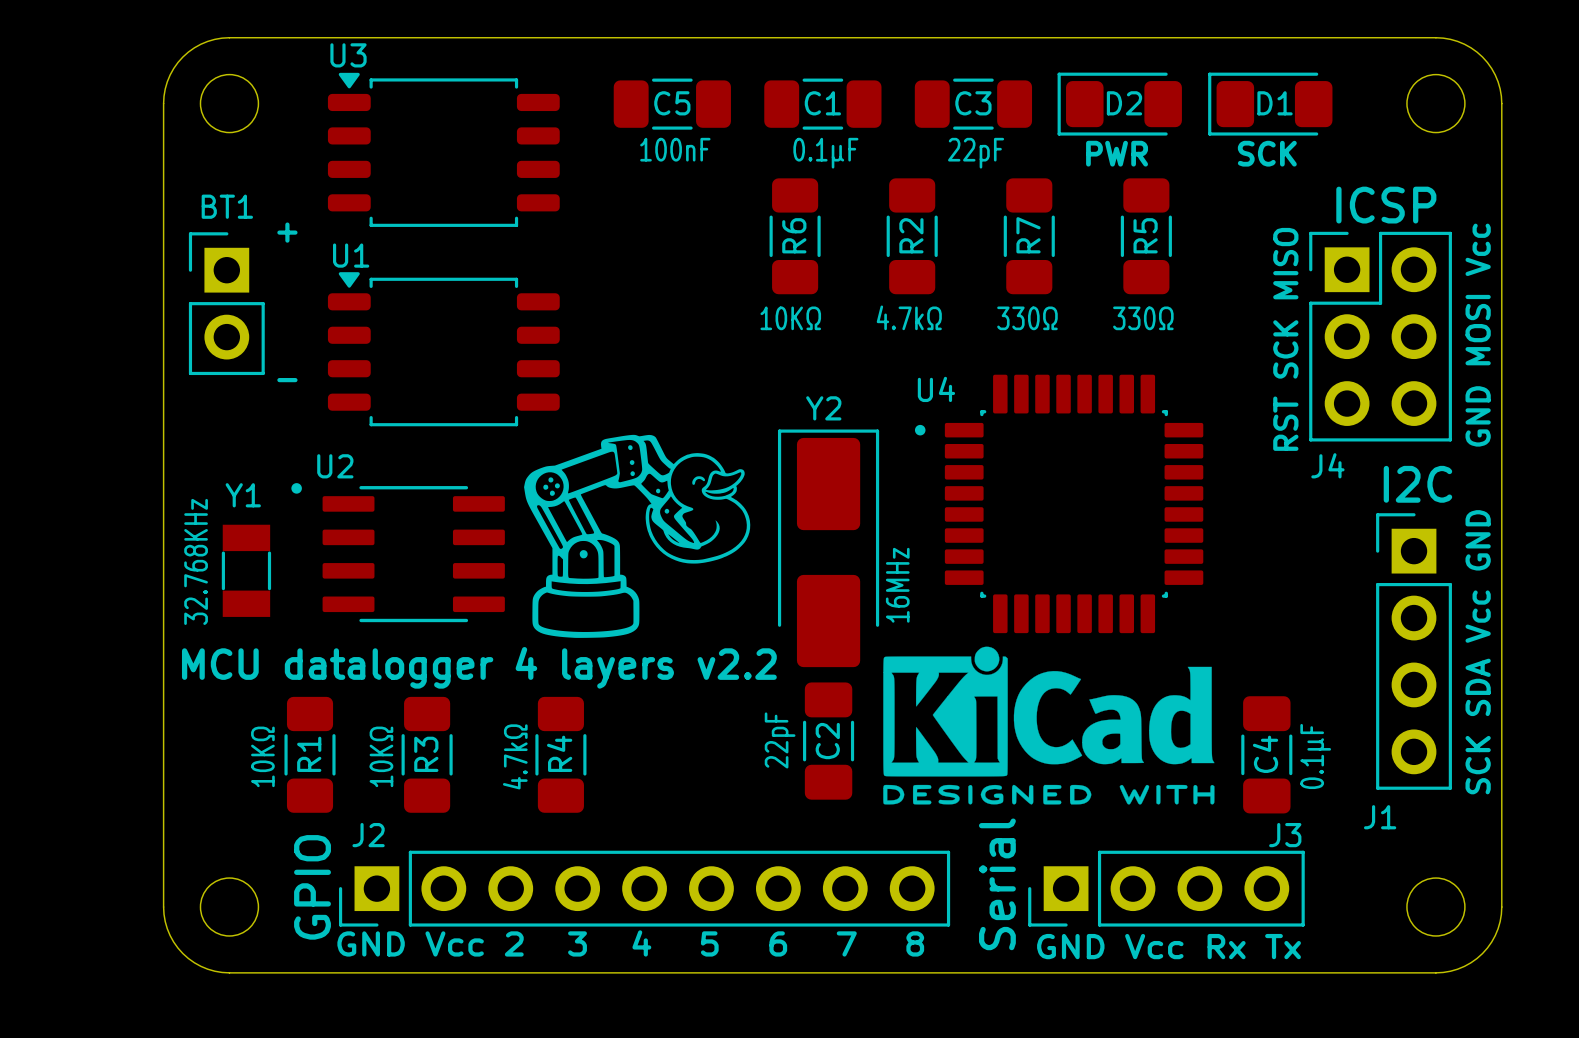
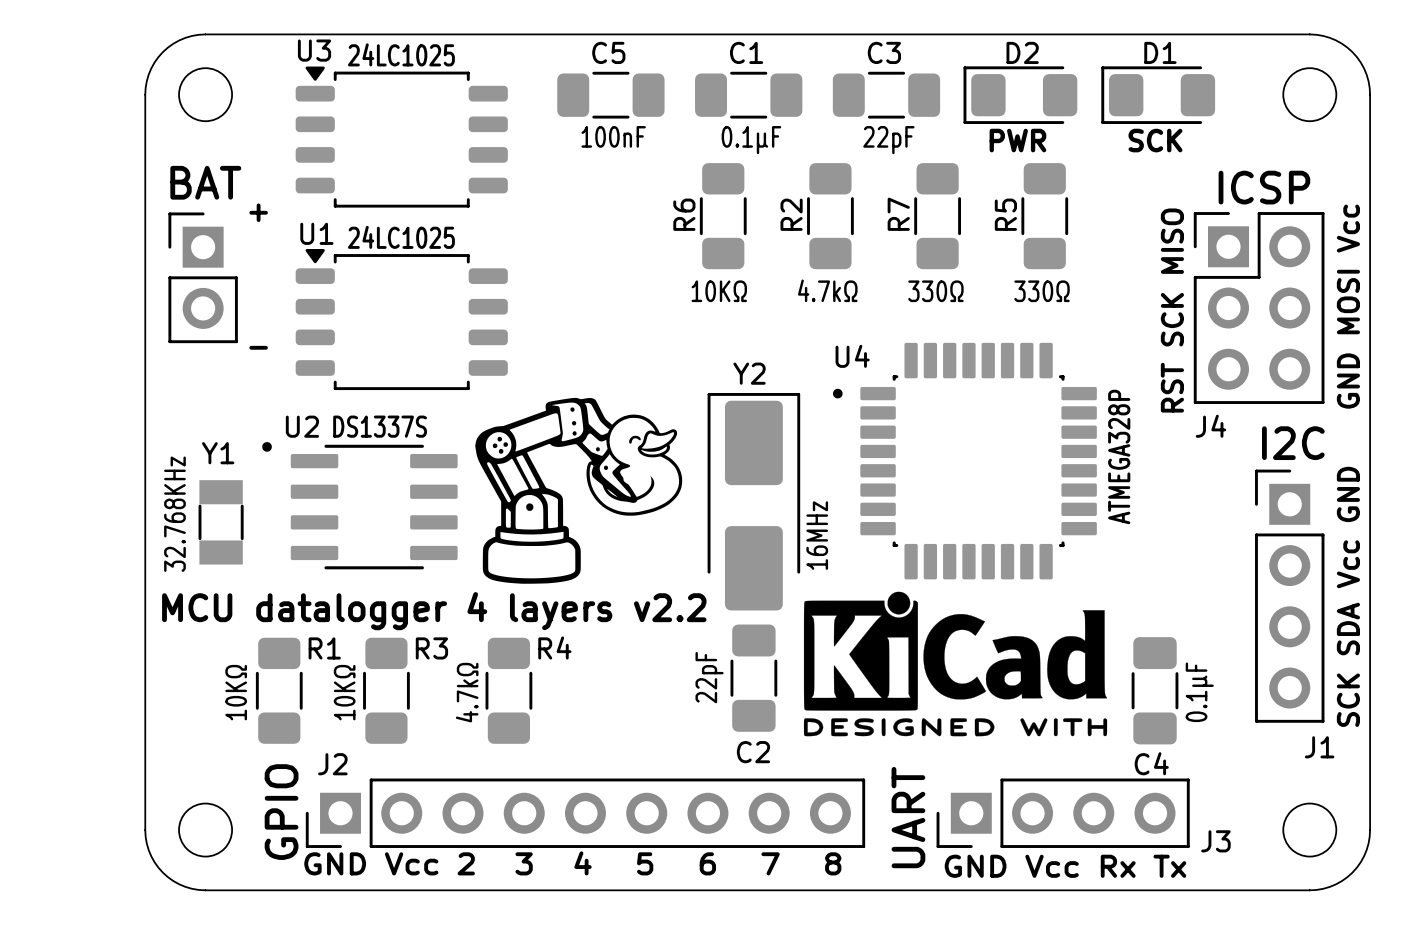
U3 value: none -> 24LC1025 (401, 54)
C5 name position: C5 (672, 103) -> C5 (608, 52)
C1 name position: C1 (822, 103) -> C1 (746, 52)
C3 name position: C3 (973, 103) -> C3 (884, 52)
D2 name position: D2 (1124, 103) -> D2 (1022, 52)
D1 name position: D1 (1275, 103) -> D1 (1160, 52)
BT1 name: BT1 (227, 206) -> BAT (205, 182)
R6 name position: R6 (794, 235) -> R6 (684, 214)
R2 name position: R2 (911, 235) -> R2 (791, 214)
R7 name position: R7 (1028, 235) -> R7 (898, 214)
R5 name position: R5 (1145, 235) -> R5 (1005, 214)
U1 value: none -> 24LC1025 (401, 237)
U2 value: none -> DS1337S (380, 426)
U4 value: none -> ATMEGA328P (1119, 456)
C2 name rotation: 0° (827, 741) -> 90° clockwise (753, 752)
C2 name position: C2 (827, 741) -> C2 (753, 752)
R4 name rotation: 0° (559, 753) -> 90° clockwise (554, 647)
R4 name position: R4 (559, 753) -> R4 (554, 647)
R1 name rotation: 0° (309, 754) -> 90° clockwise (324, 648)
R1 name position: R1 (309, 754) -> R1 (324, 648)
R3 name rotation: 0° (426, 754) -> 90° clockwise (431, 648)
R3 name position: R3 (426, 754) -> R3 (431, 648)
C4 name rotation: 0° (1265, 754) -> 90° clockwise (1151, 763)
C4 name position: C4 (1265, 754) -> C4 (1151, 763)
J1 name position: J1 (1380, 817) -> J1 (1319, 747)
J3 name position: J3 (1285, 835) -> J3 (1215, 841)
text: Serial (997, 884) -> UART (908, 817)

